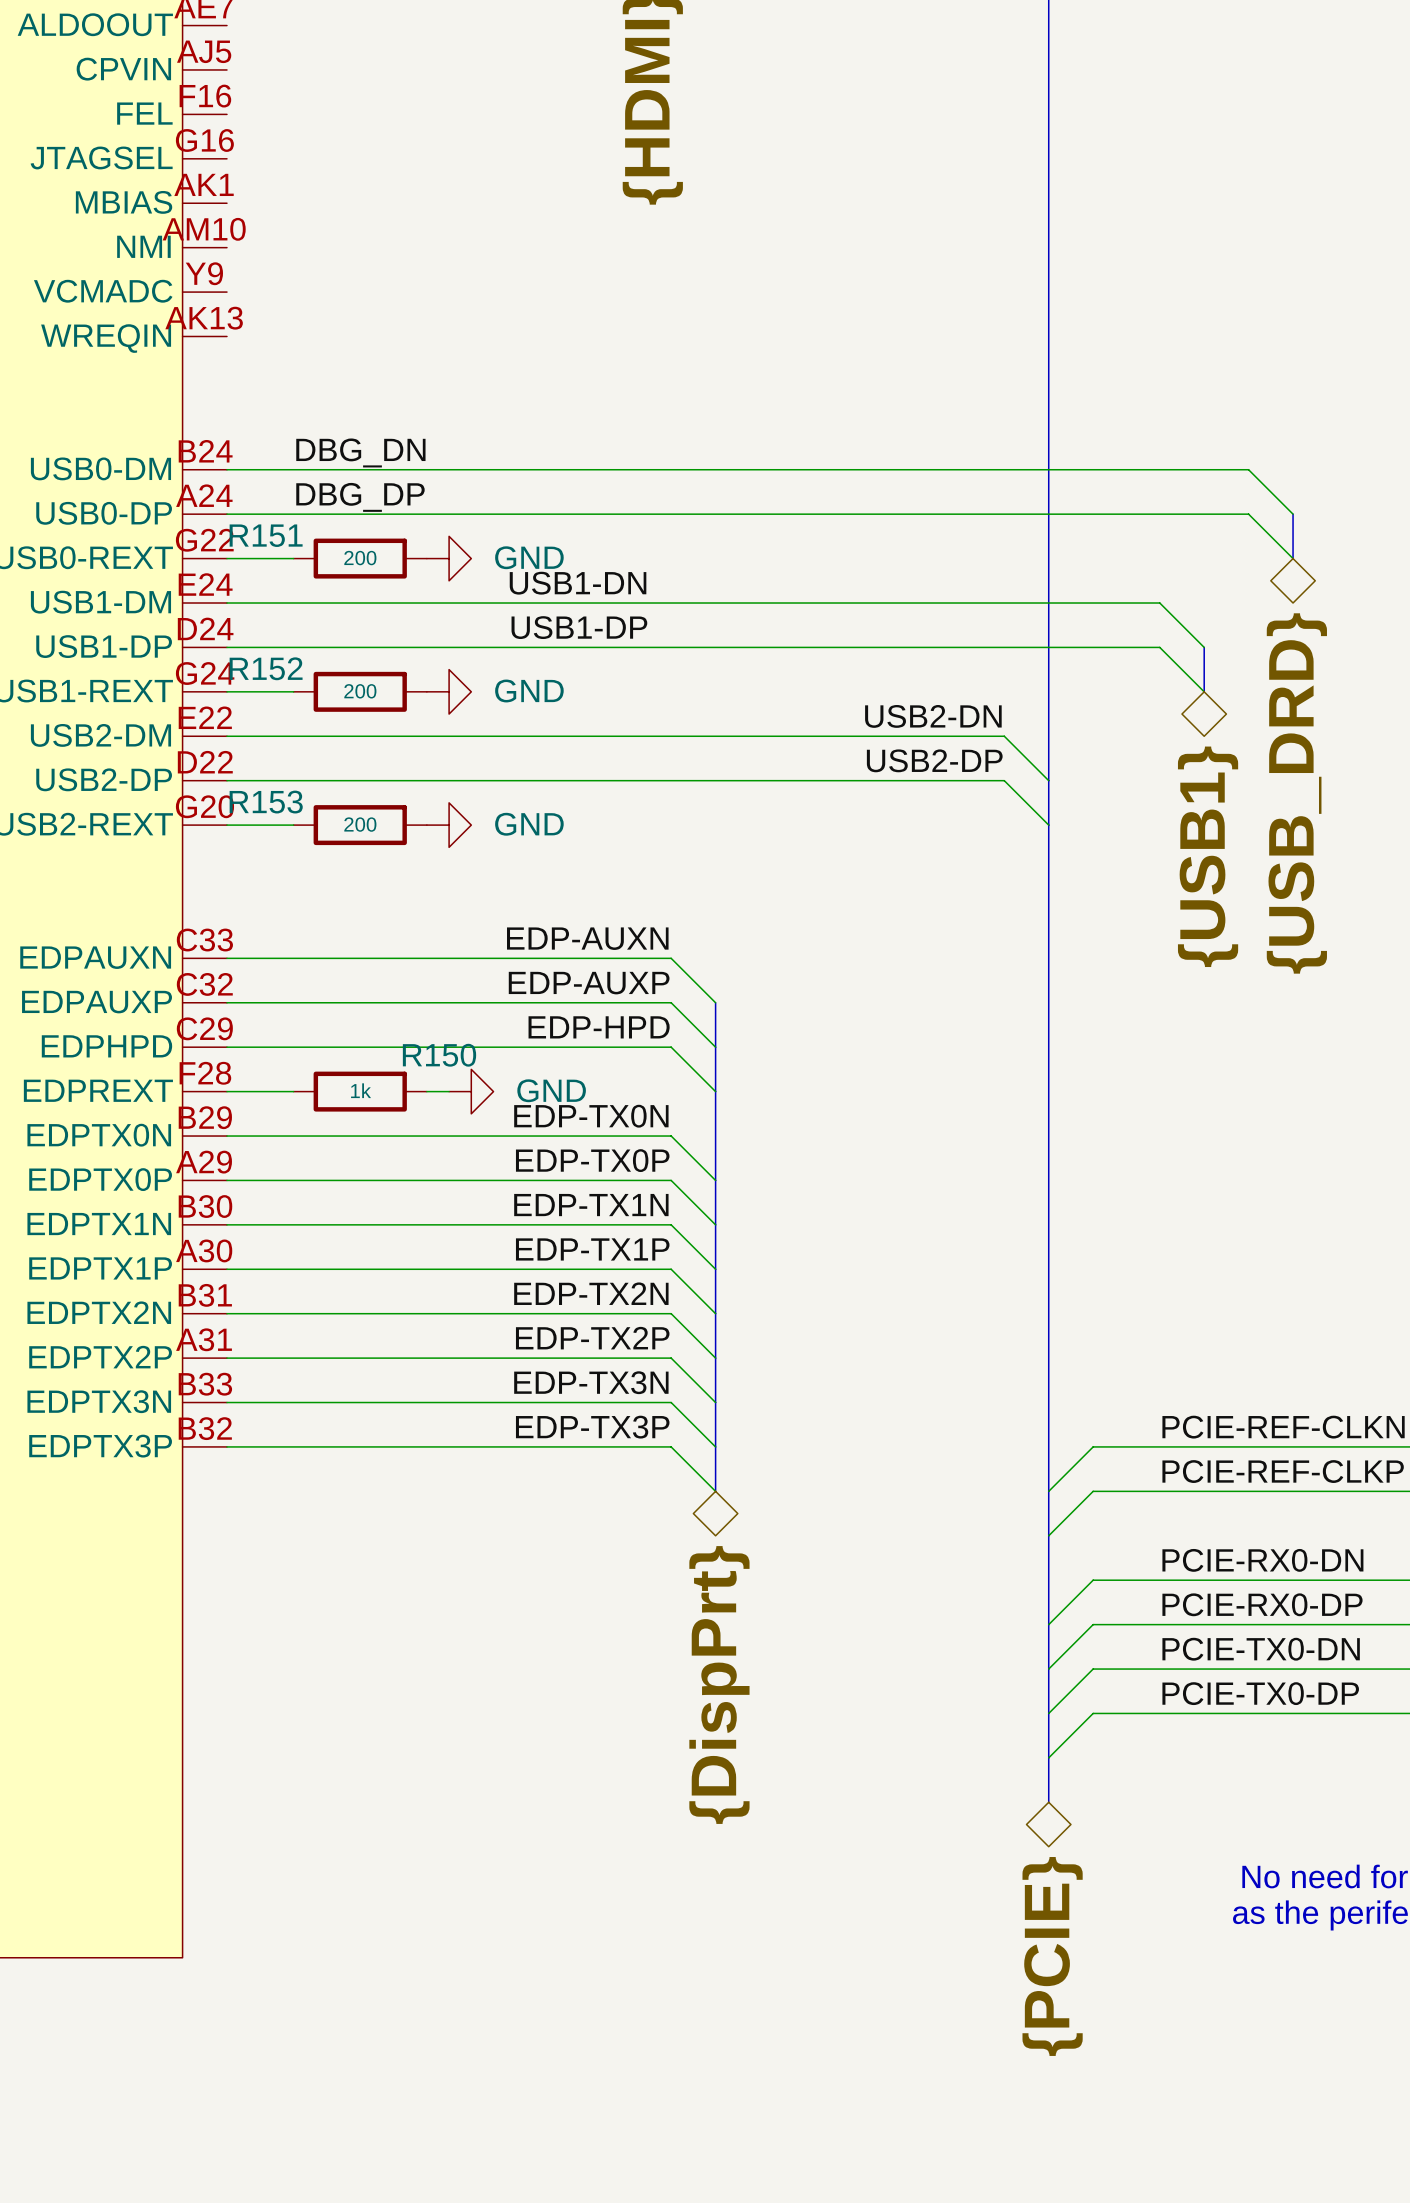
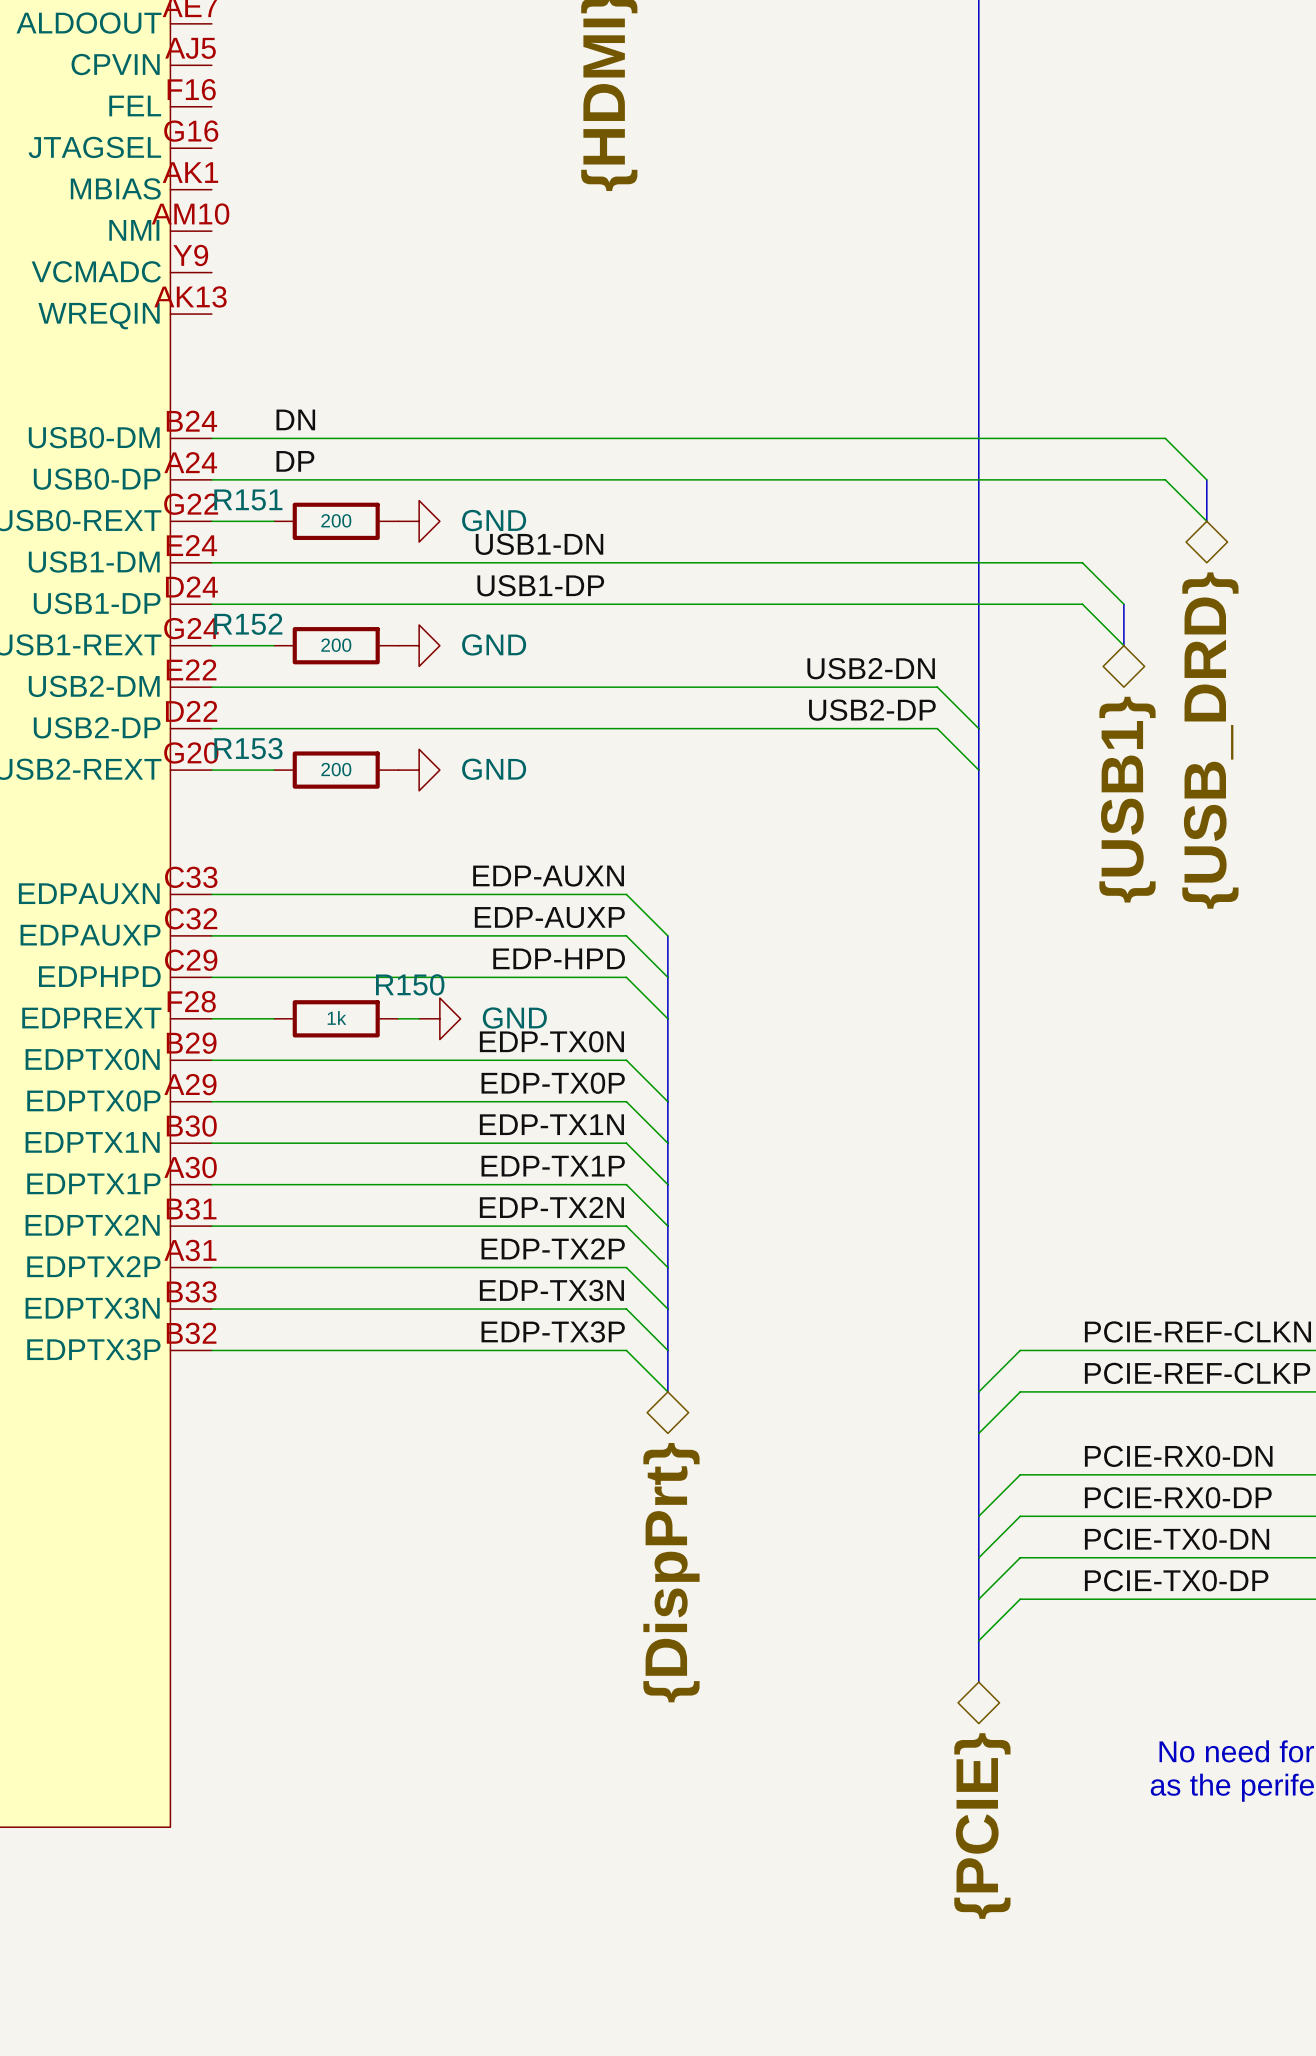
label: DBG_DN (360, 452) -> DN (295, 419)
label: DBG_DP (360, 497) -> DP (295, 461)

